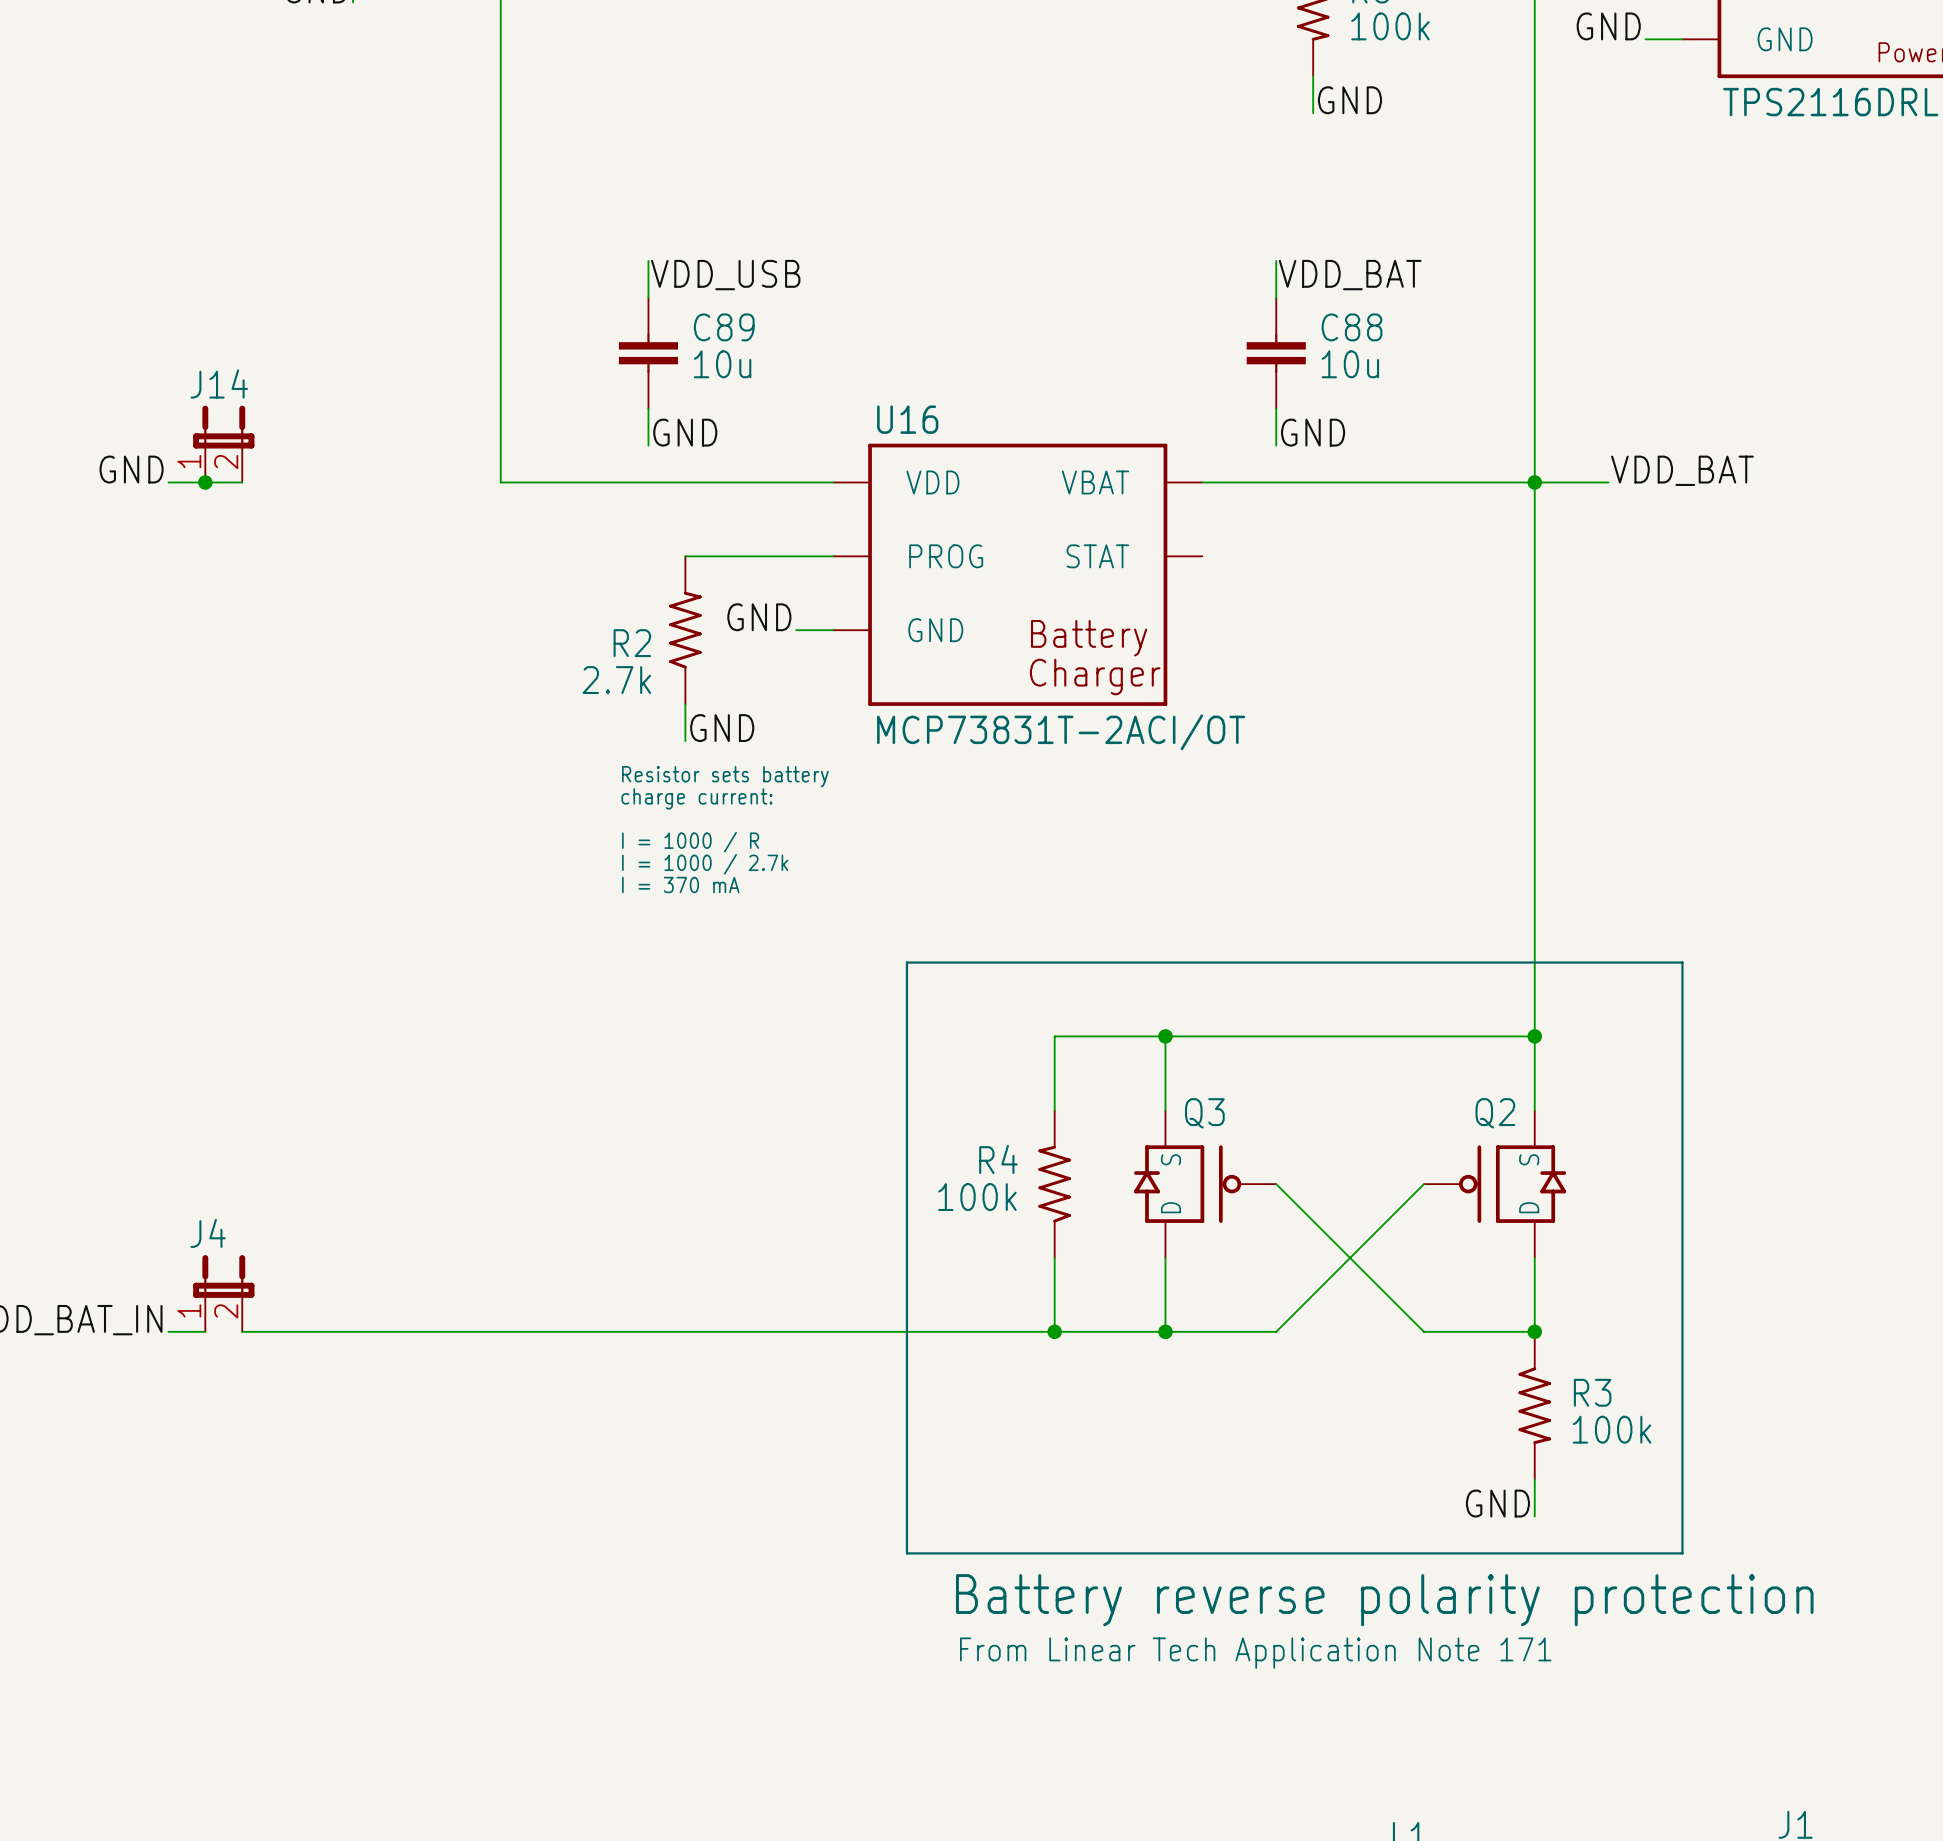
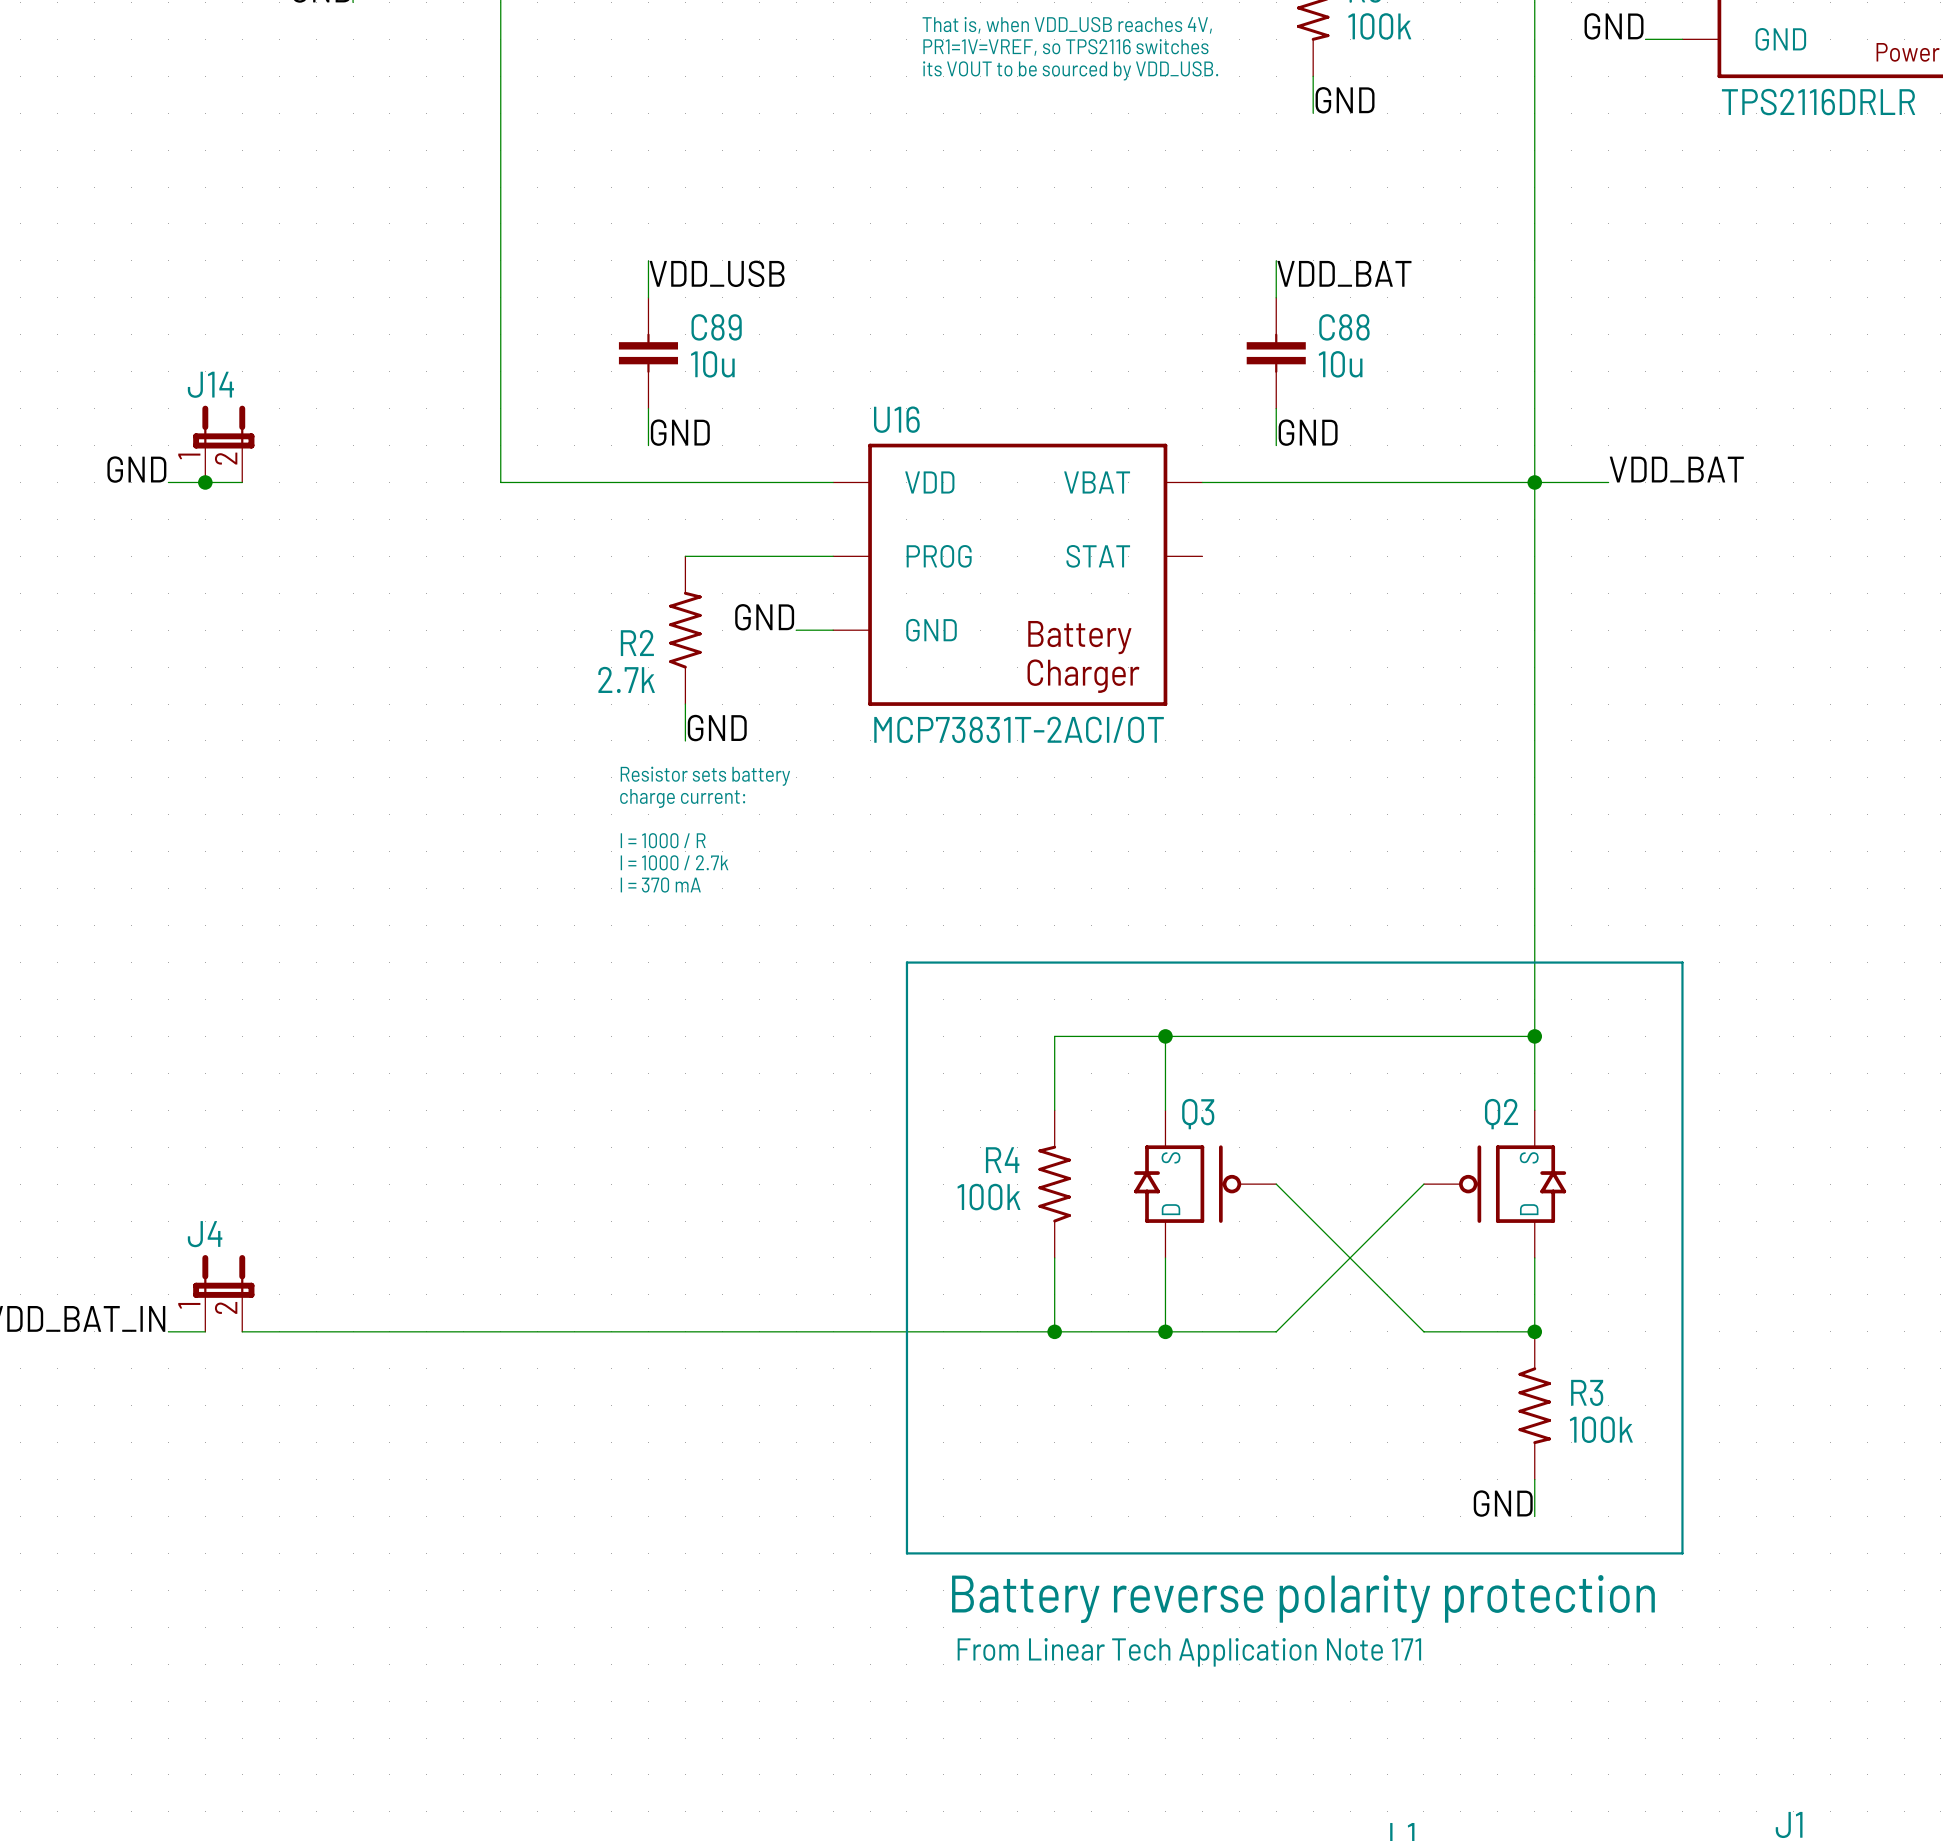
text: none -> That is, when VDD_USB reaches 4V, (1067, 25)
text: none -> PR1=1V=VREF, so TPS2116 switches (1065, 47)
text: none -> its VOUT to be sourced by VDD_USB. (1070, 70)

